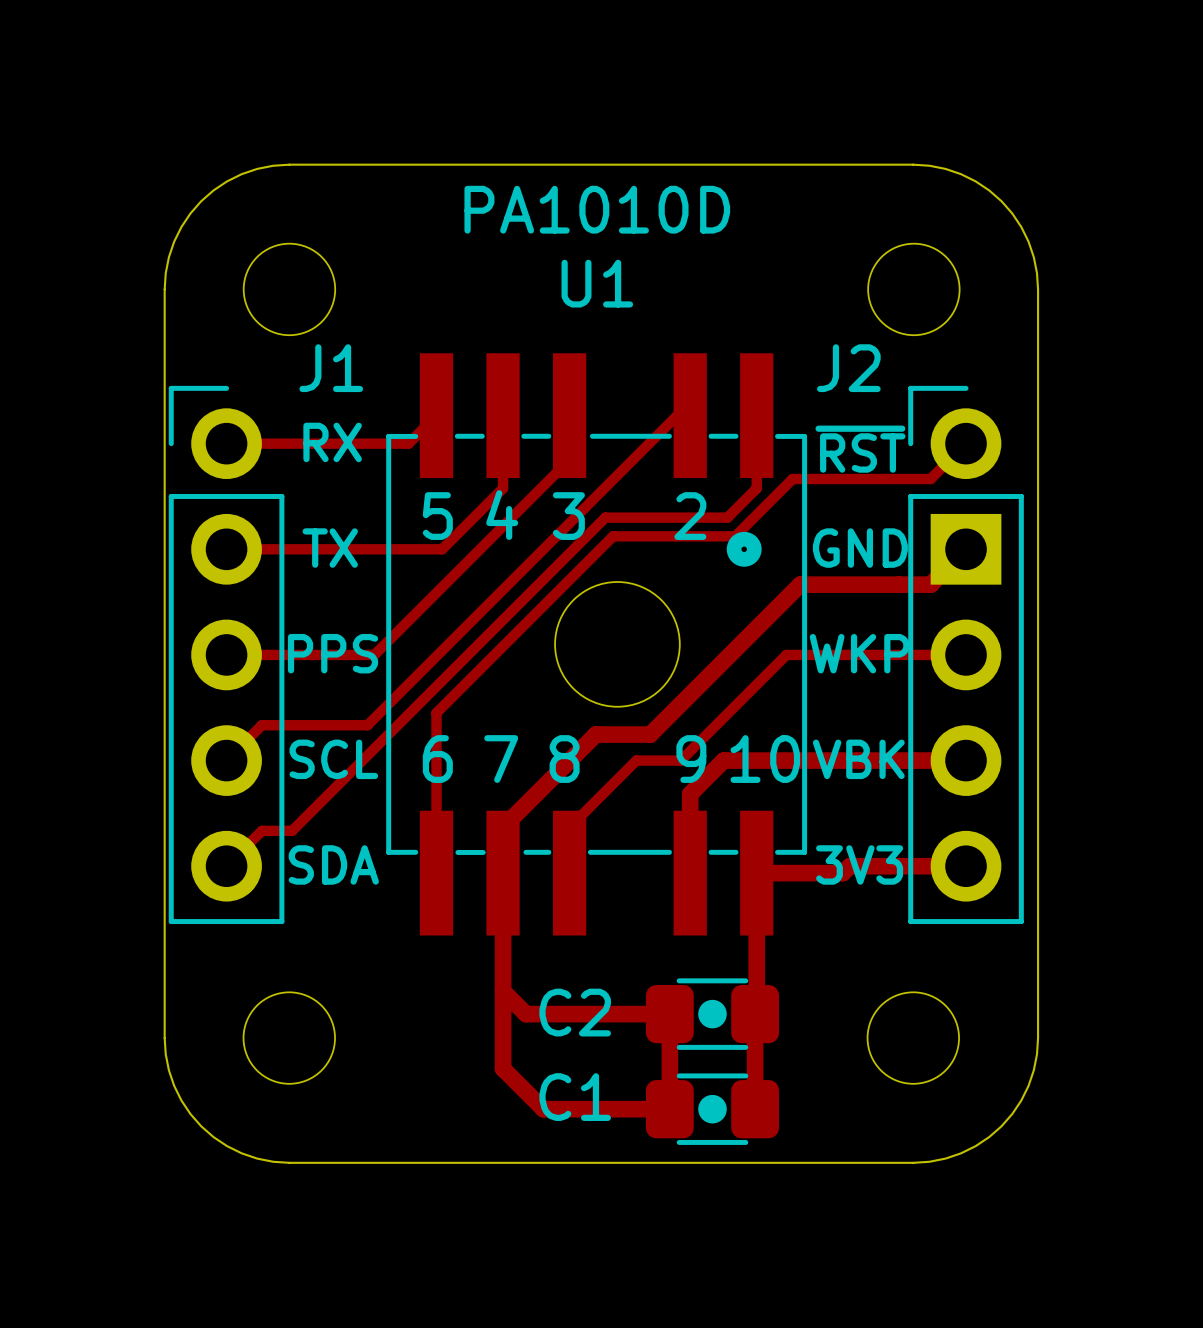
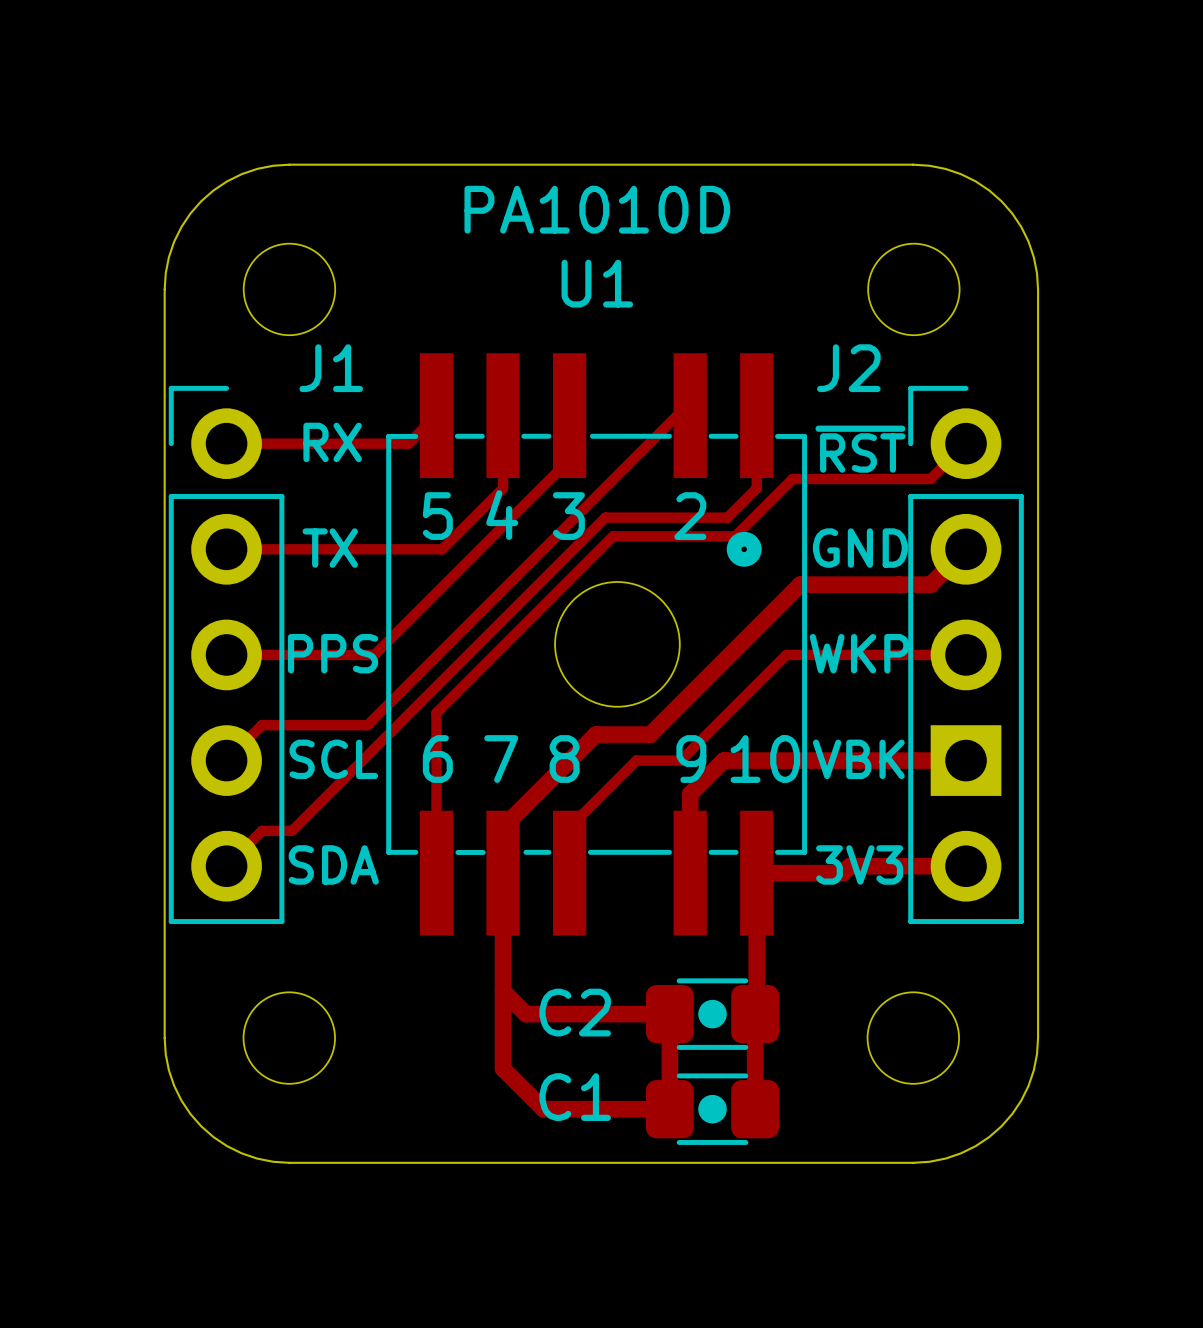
J2 footprint: [908, 385, 1024, 925] -> [908, 385, 1024, 925]

